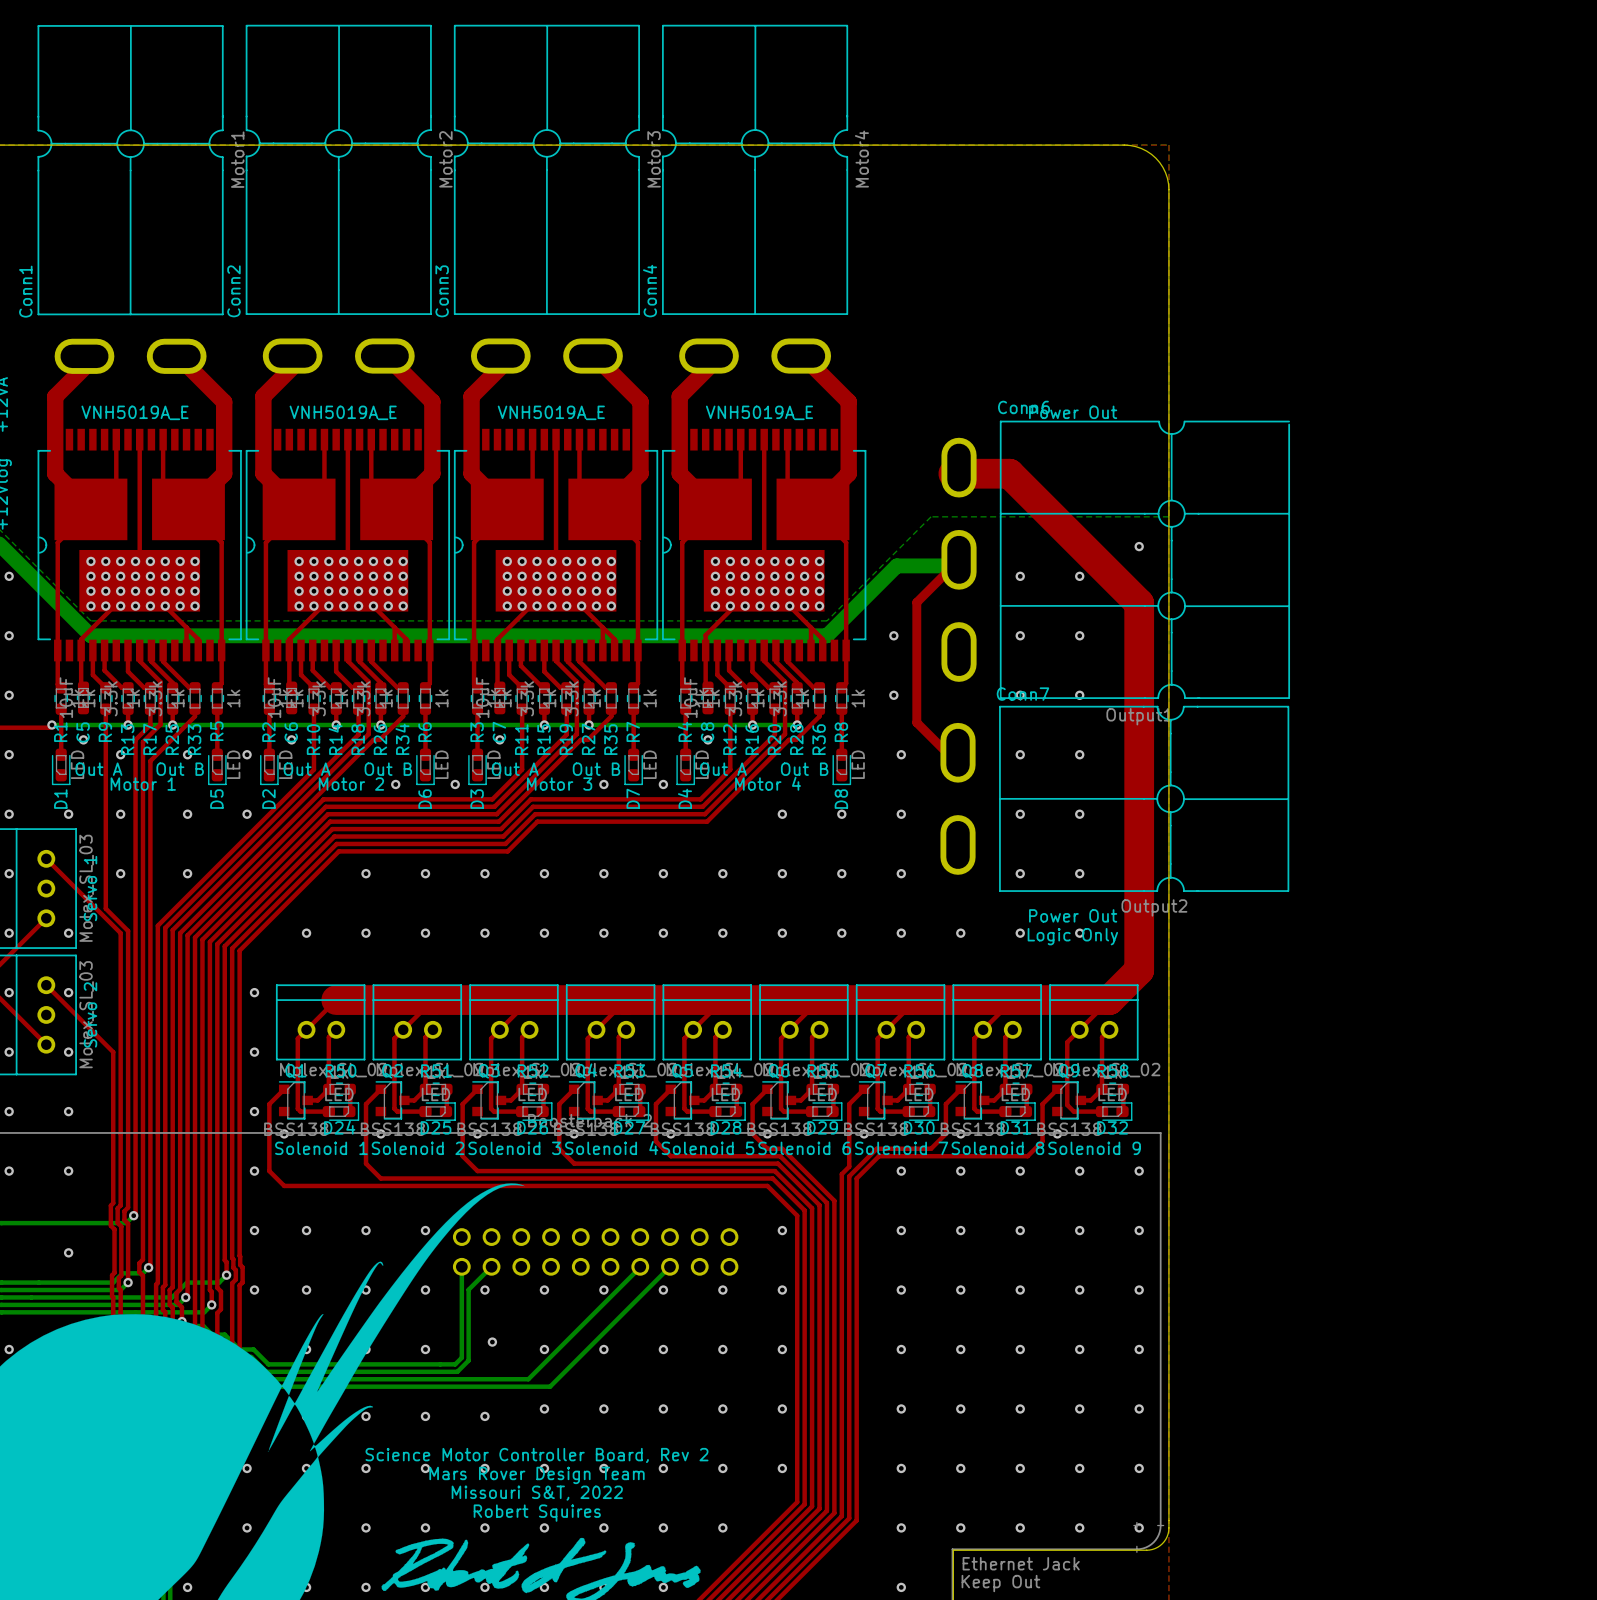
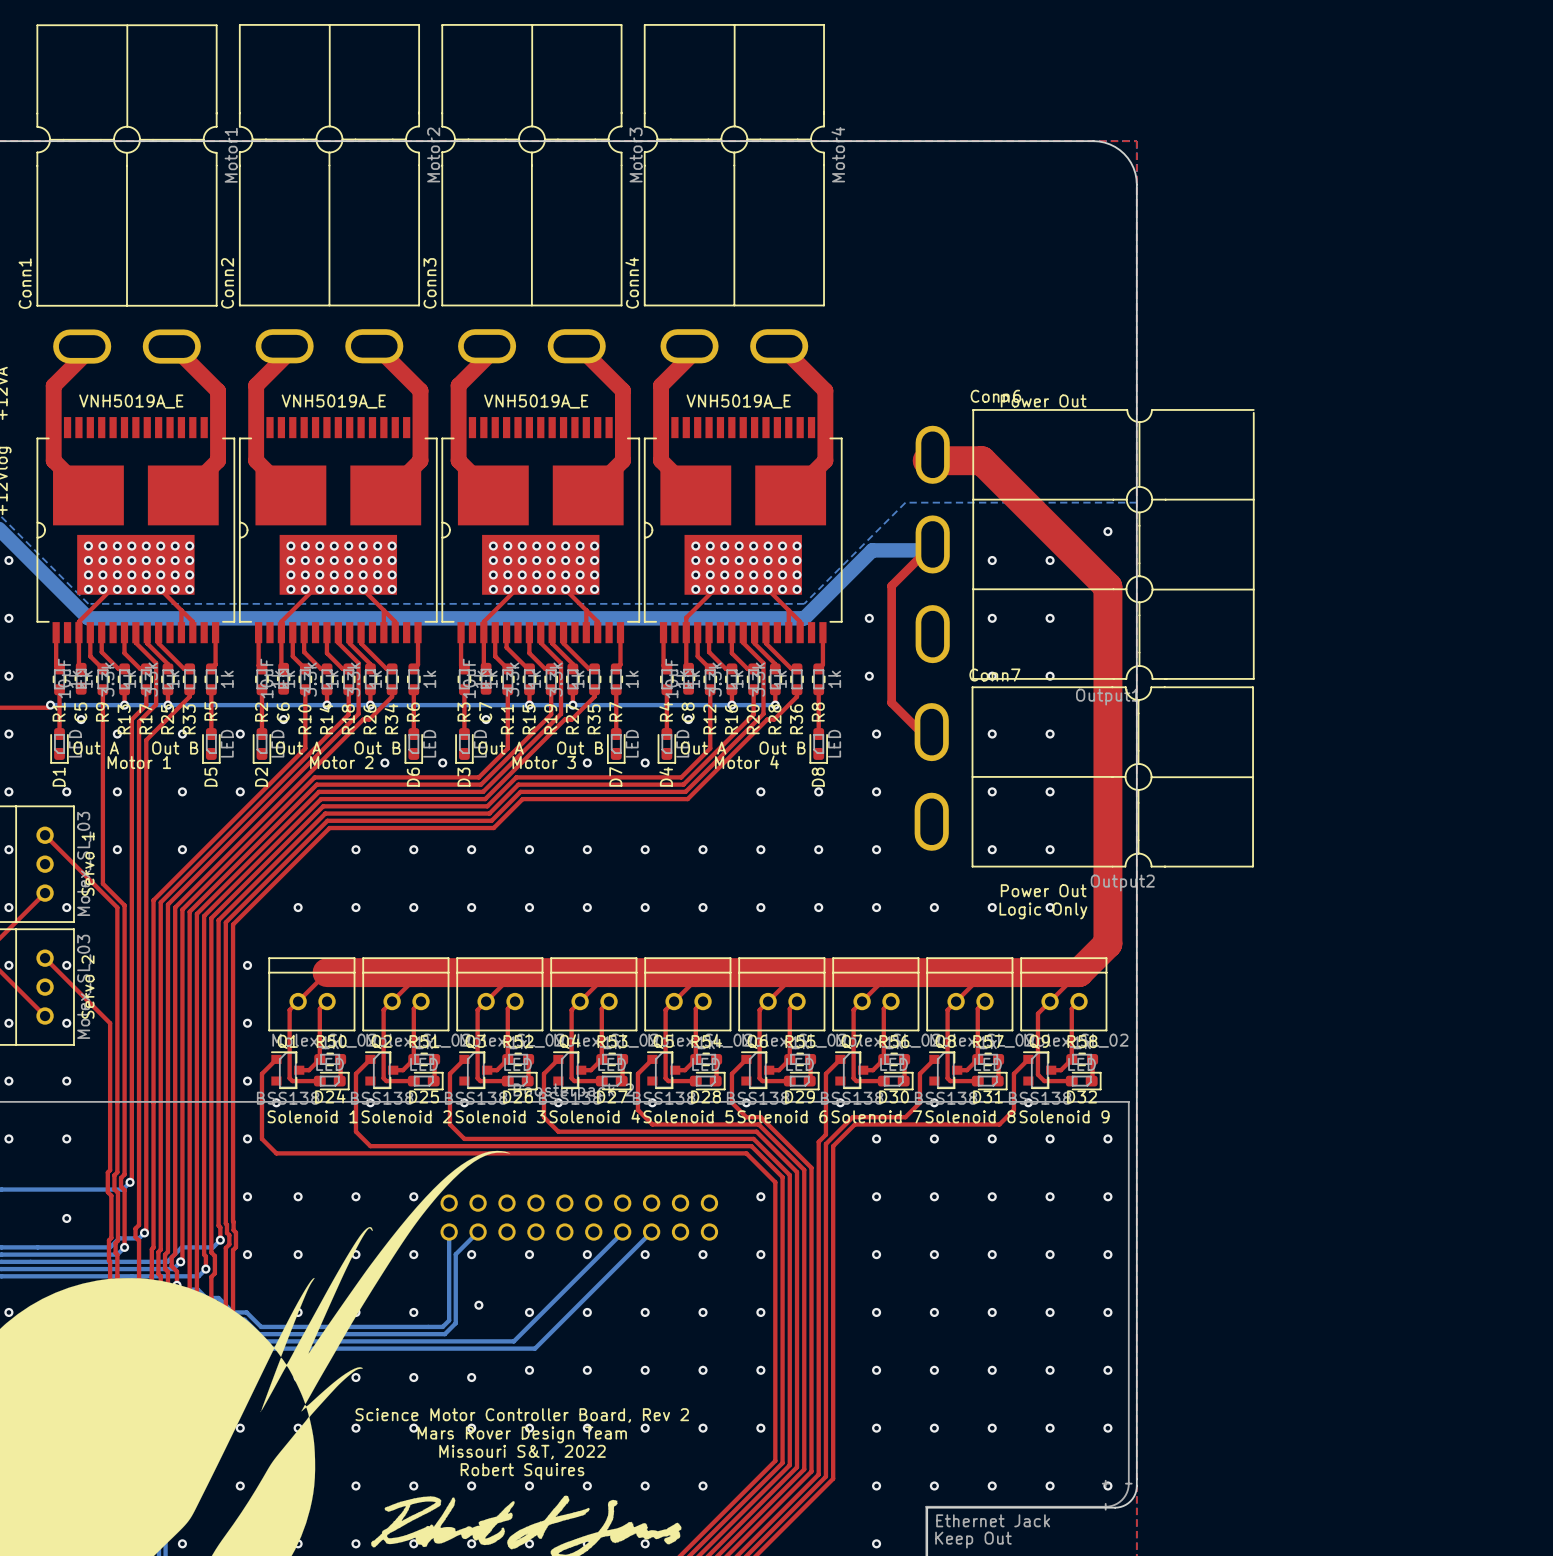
top track: (116, 439) (116, 484) (57, 542) (57, 650) -> none
top track: (139, 439) (139, 580) -> none
top track: (163, 439) (163, 484) (221, 542) (221, 650) -> none
top track: (324, 439) (324, 484) (265, 542) (265, 650) -> none
top track: (347, 439) (347, 580) -> none
top track: (371, 439) (371, 484) (429, 542) (429, 650) -> none
top track: (532, 439) (532, 484) (474, 542) (474, 650) -> none
top track: (556, 439) (556, 580) -> none
top track: (579, 439) (579, 484) (637, 542) (637, 650) -> none
top track: (740, 439) (740, 484) (682, 542) (682, 650) -> none
top track: (764, 439) (764, 580) -> none
top track: (787, 439) (787, 484) (846, 542) (846, 650) -> none

